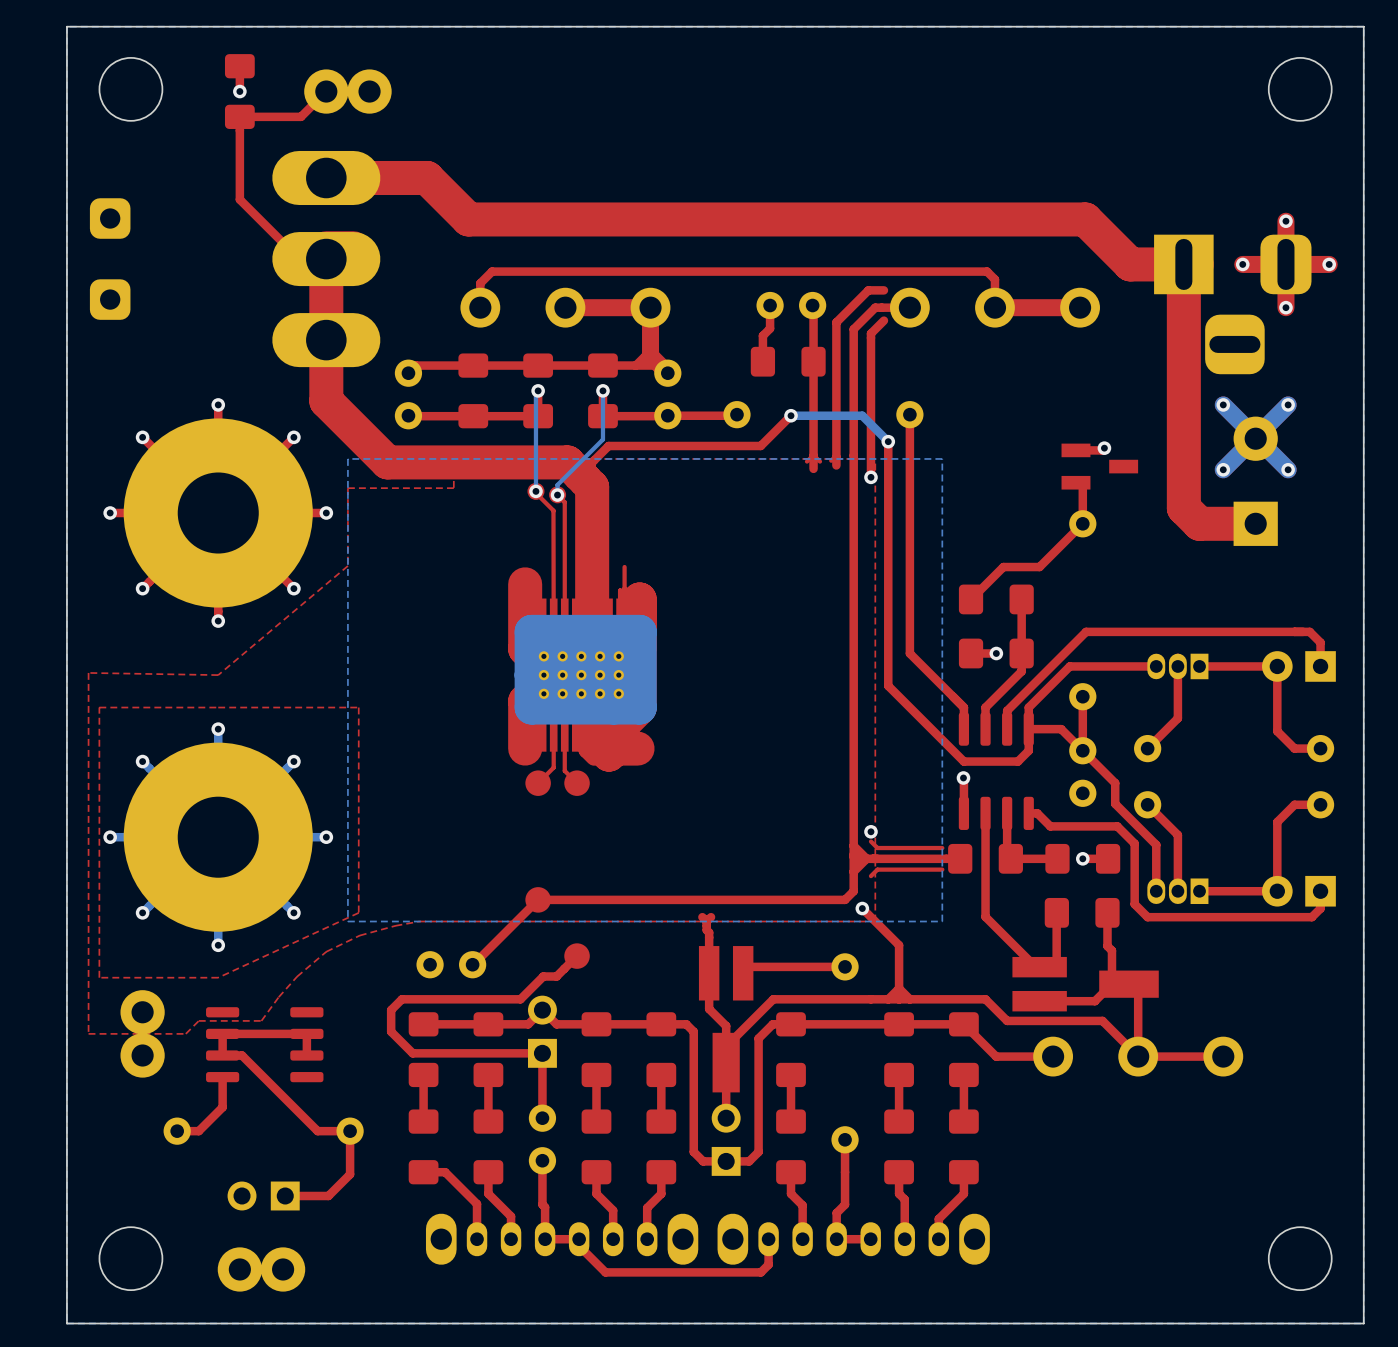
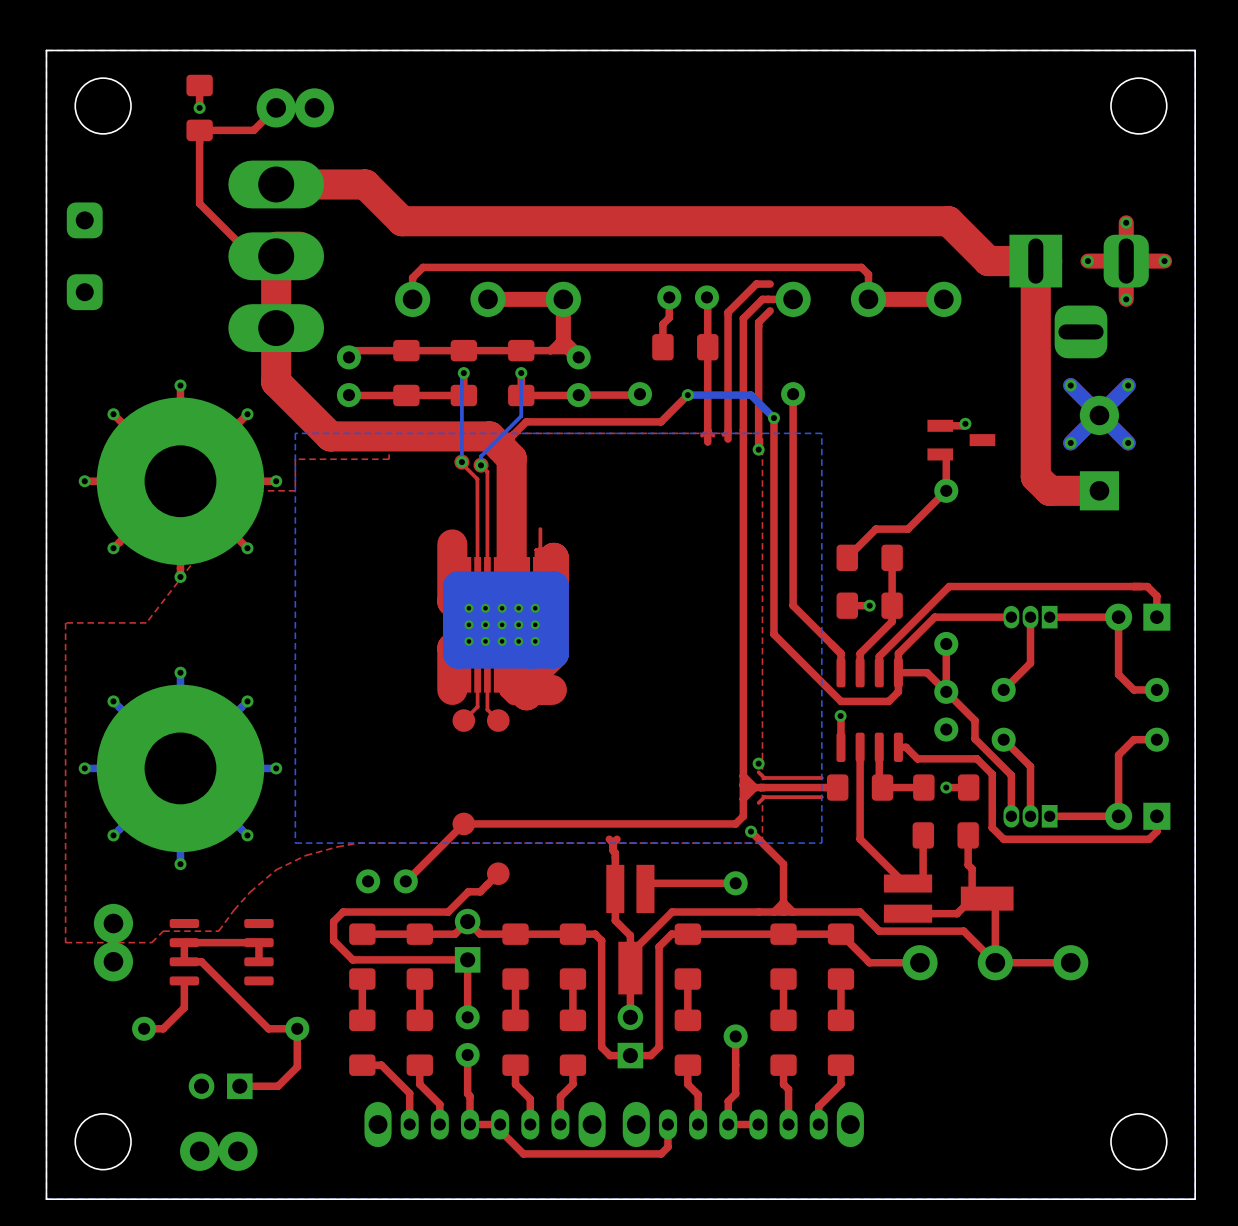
top zone outline: (347, 523) (347, 565) (218, 675) (88, 672) -> (295, 490) (248, 490) (146, 622) (65, 622)
top zone outline: (358, 707) (99, 707) (99, 977) (218, 977) (358, 912) (358, 707) -> none

